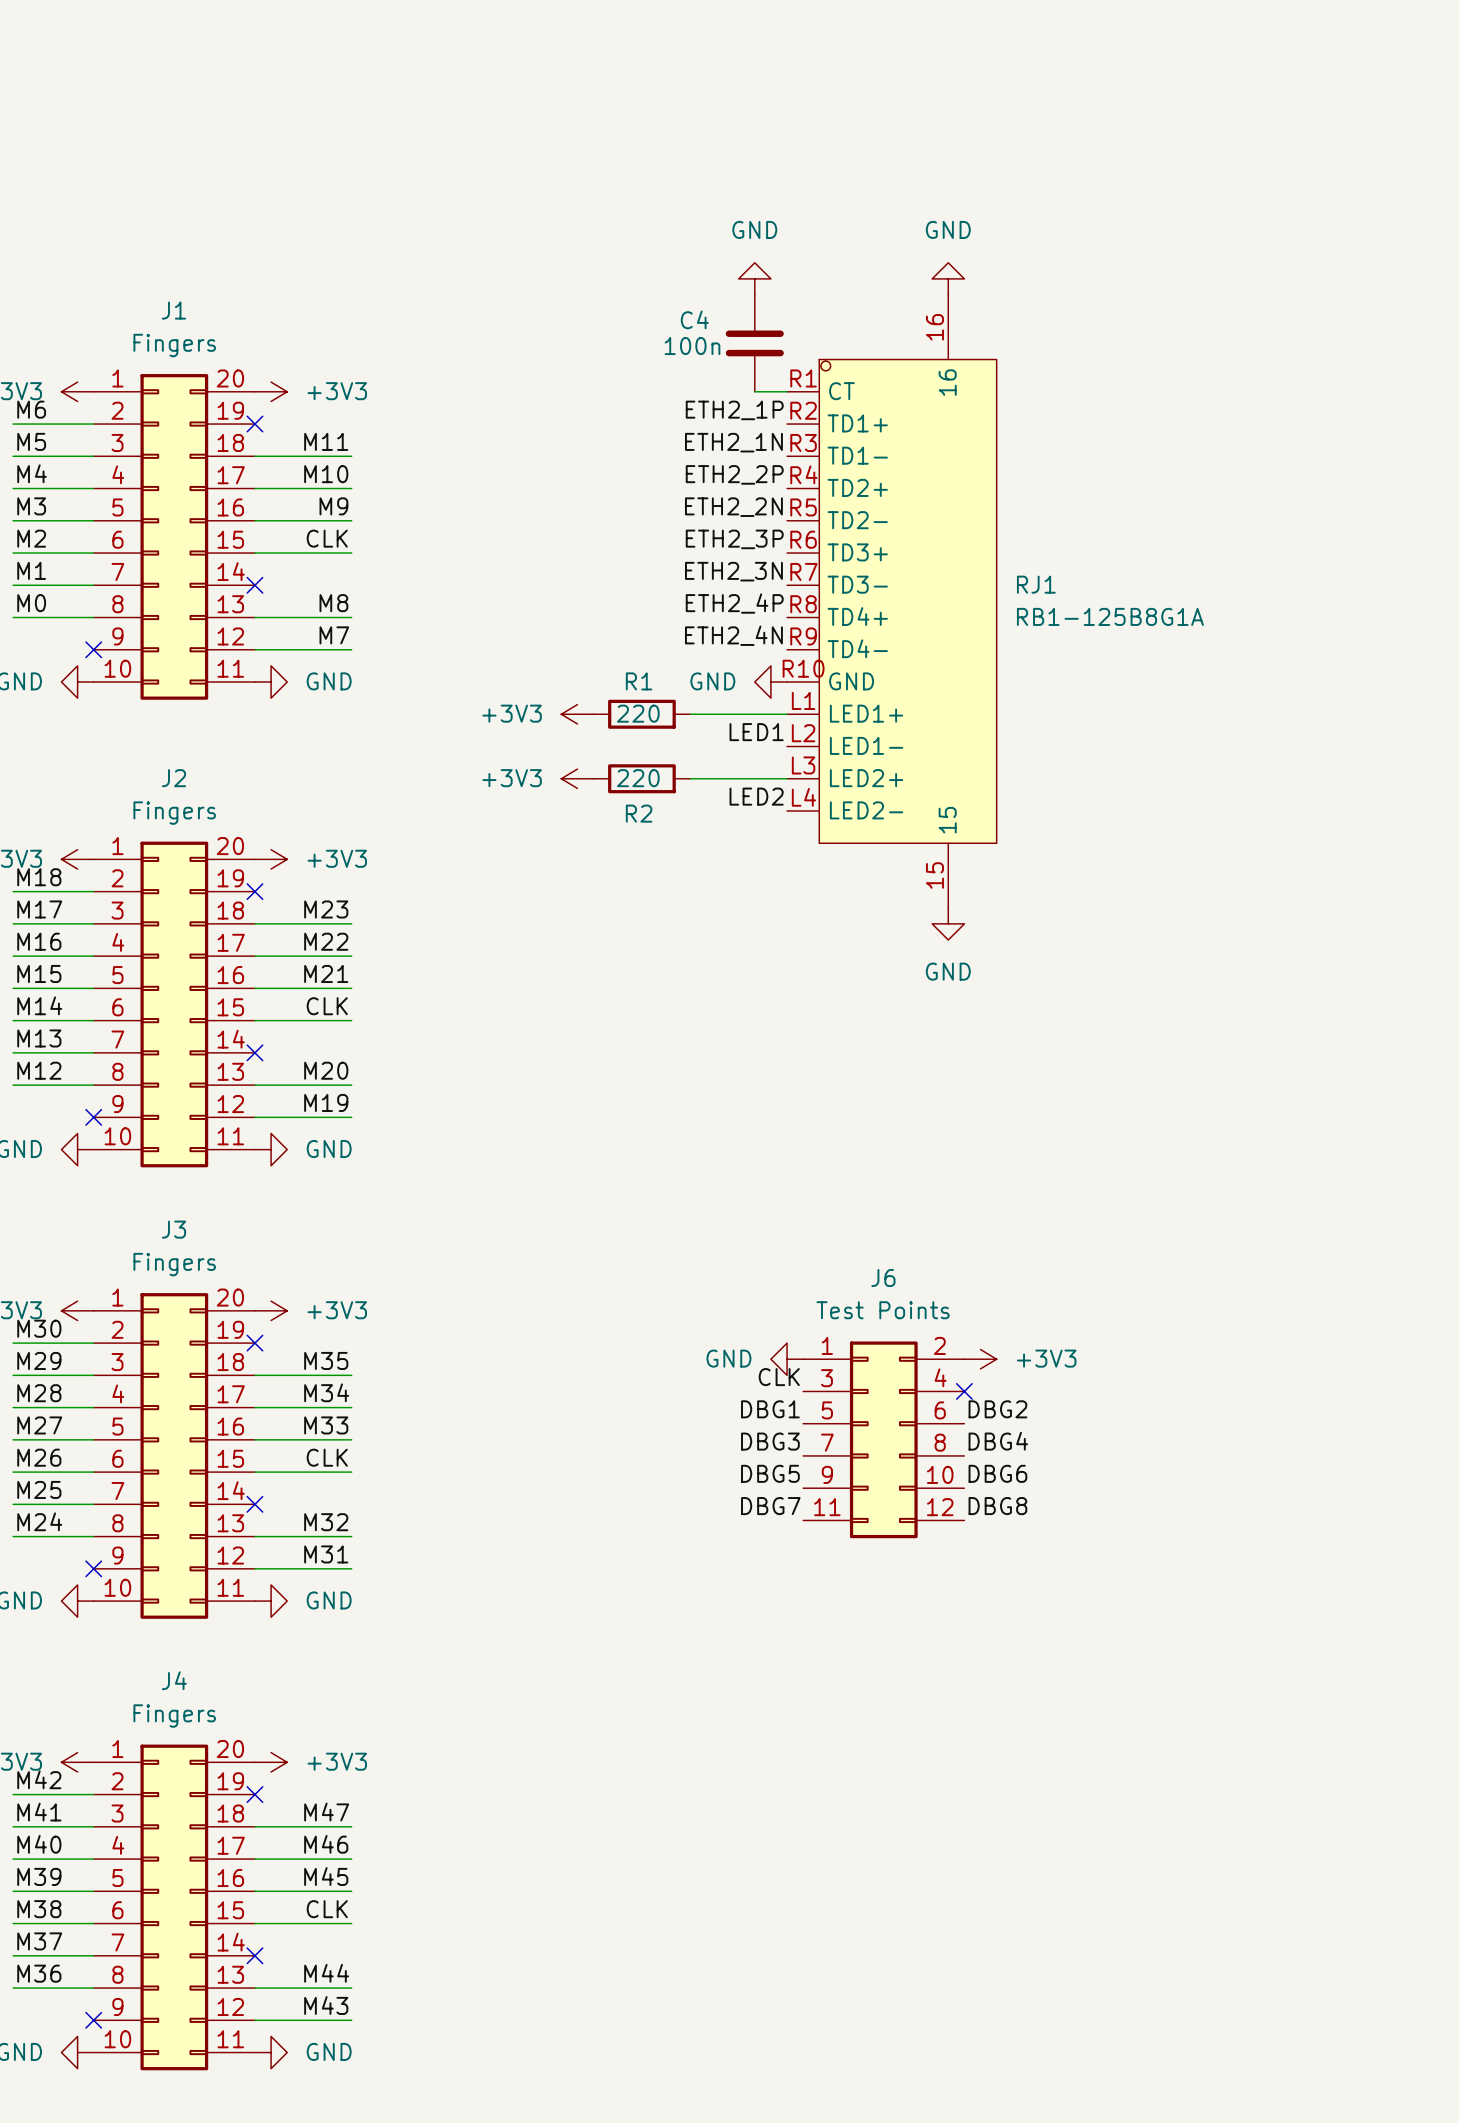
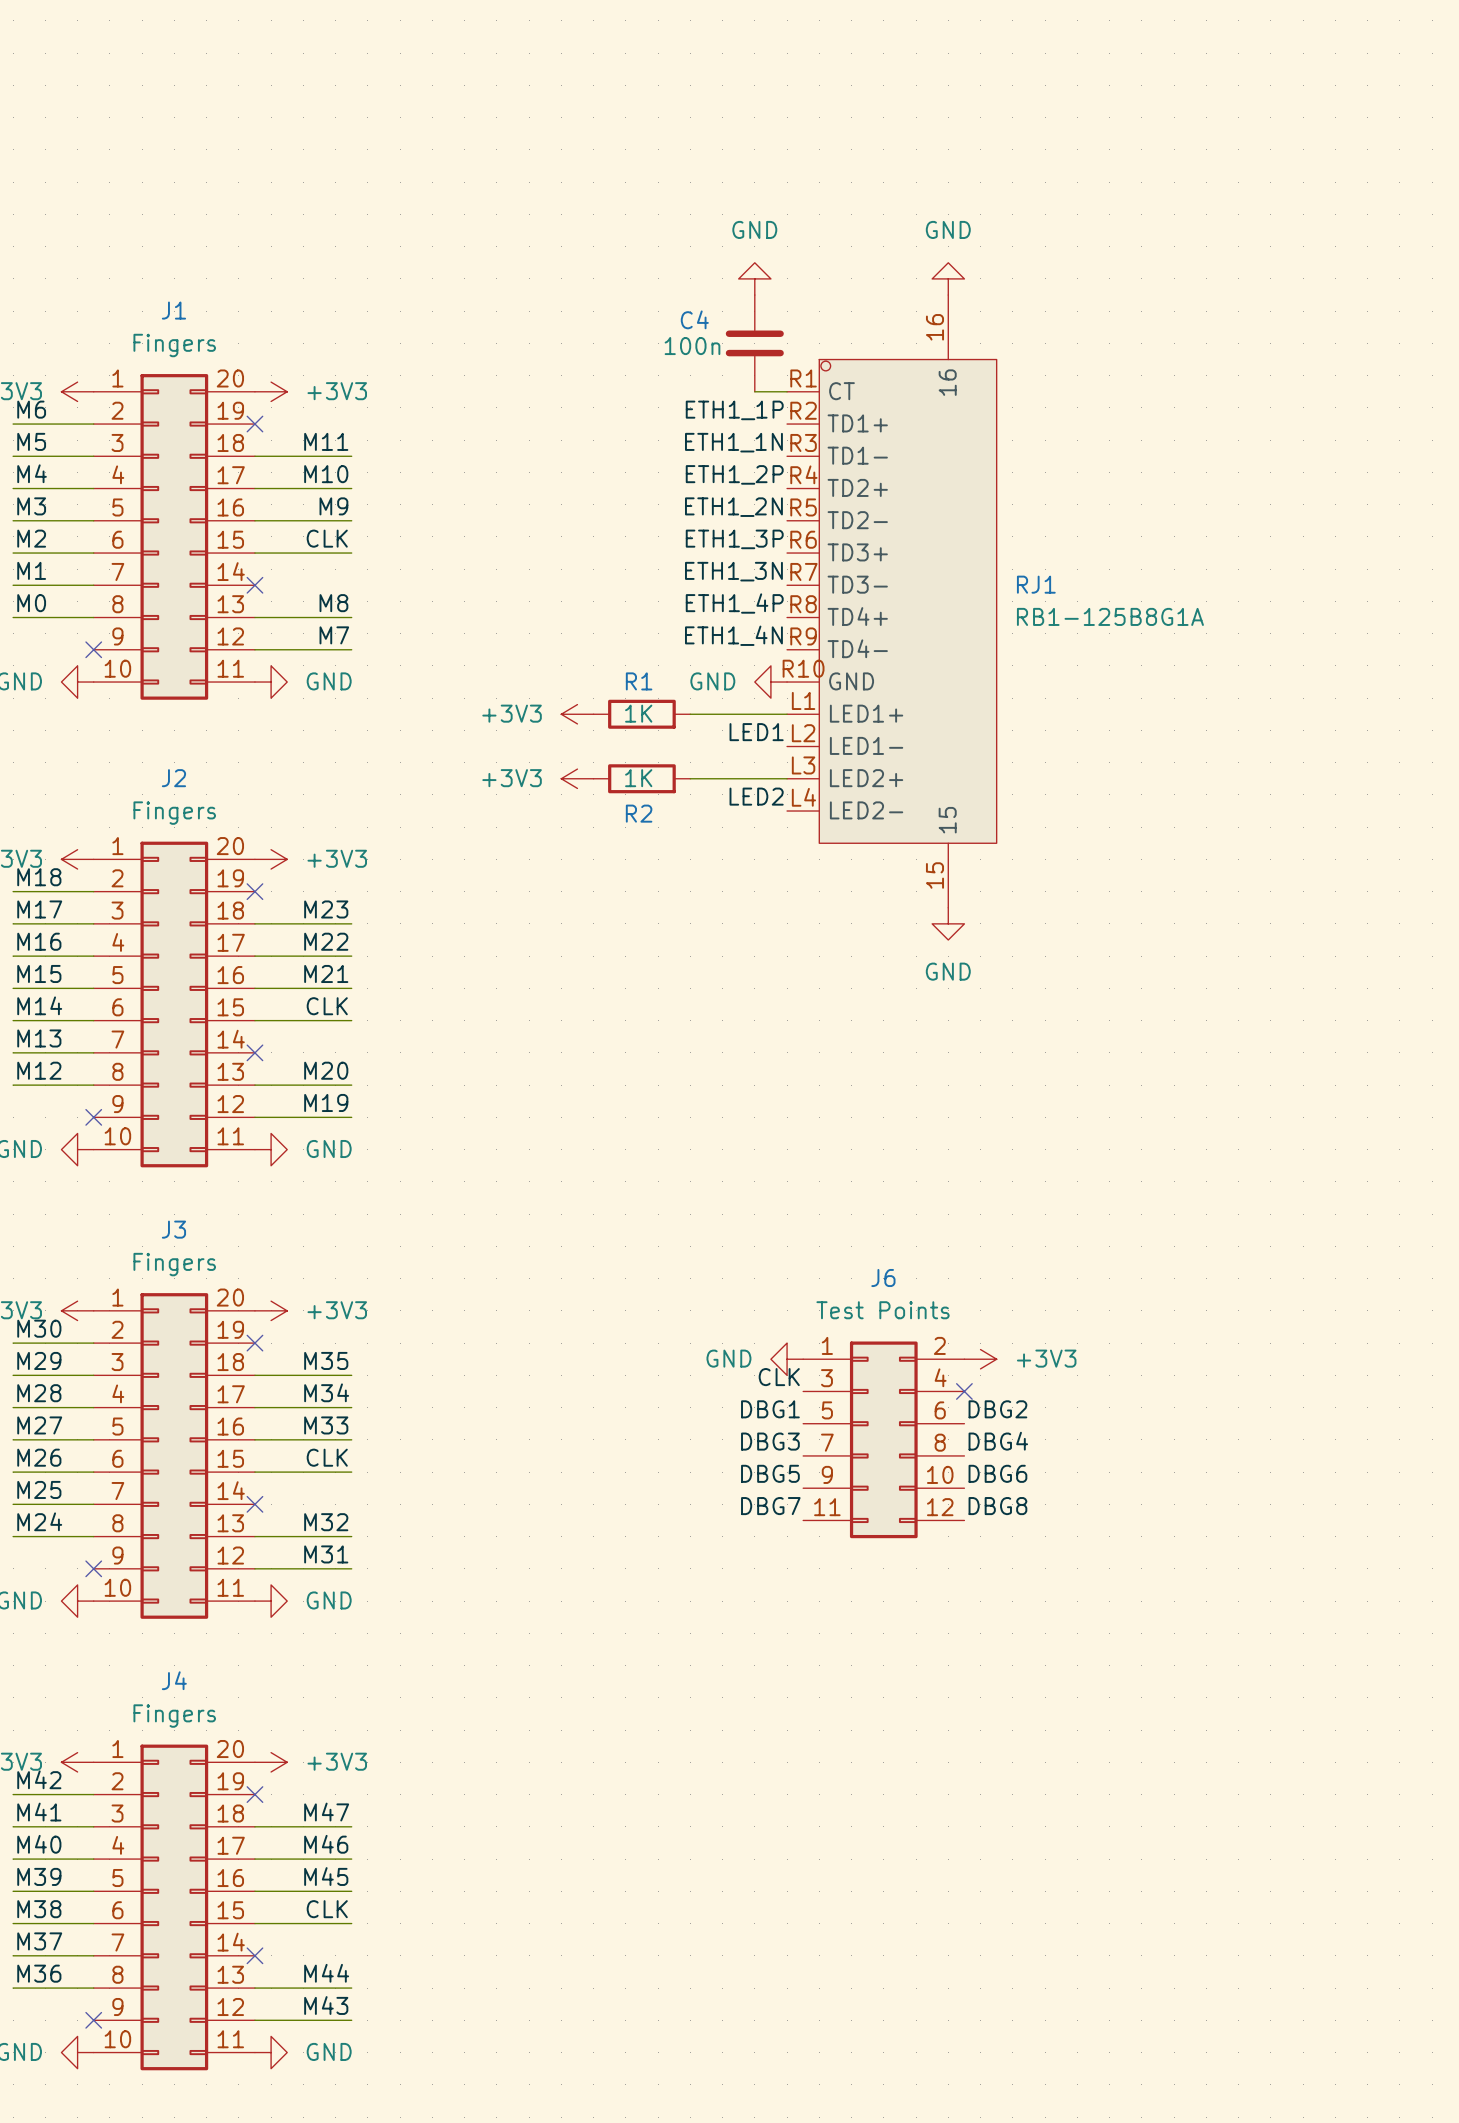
label: ETH2_1P (734, 410) -> ETH1_1P (734, 410)
label: ETH2_1N (733, 442) -> ETH1_1N (733, 442)
label: ETH2_2P (734, 474) -> ETH1_2P (734, 474)
label: ETH2_2N (733, 507) -> ETH1_2N (733, 507)
label: ETH2_3P (734, 539) -> ETH1_3P (734, 539)
label: ETH2_3N (733, 571) -> ETH1_3N (733, 571)
label: ETH2_4P (734, 603) -> ETH1_4P (734, 603)
label: ETH2_4N (733, 635) -> ETH1_4N (733, 635)
R1 value: 220 (638, 713) -> 1K (638, 713)
R2 value: 220 (638, 778) -> 1K (638, 778)

